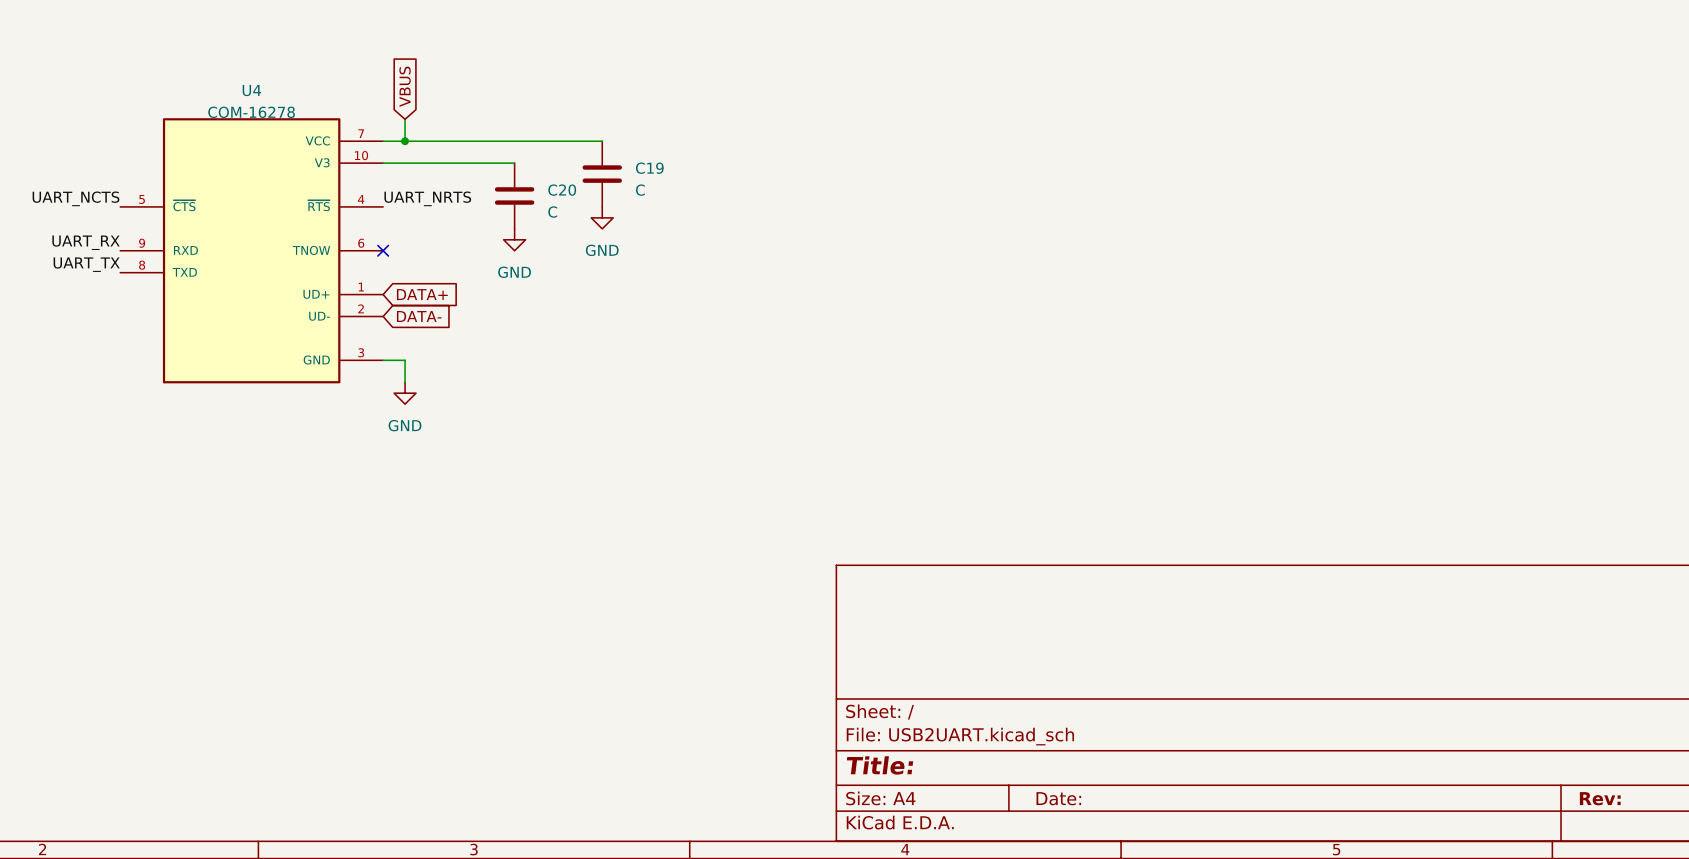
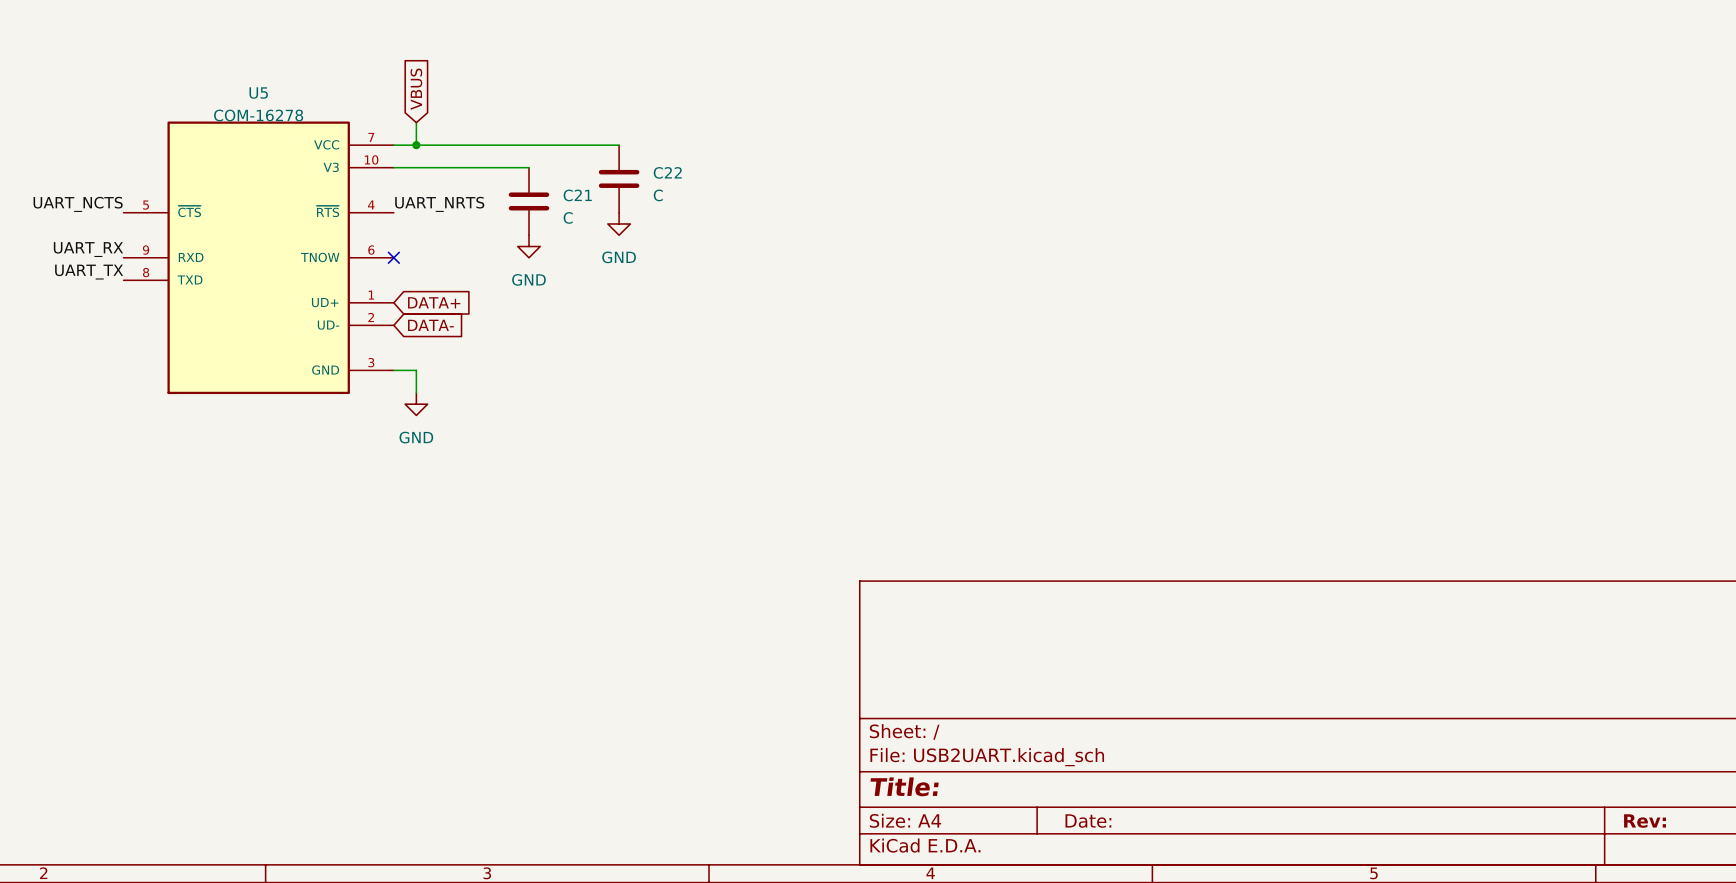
U4 name: U4 (251, 90) -> U5 (258, 93)
C19 name: C19 (649, 168) -> C22 (667, 172)
C20 name: C20 (562, 190) -> C21 (577, 195)

